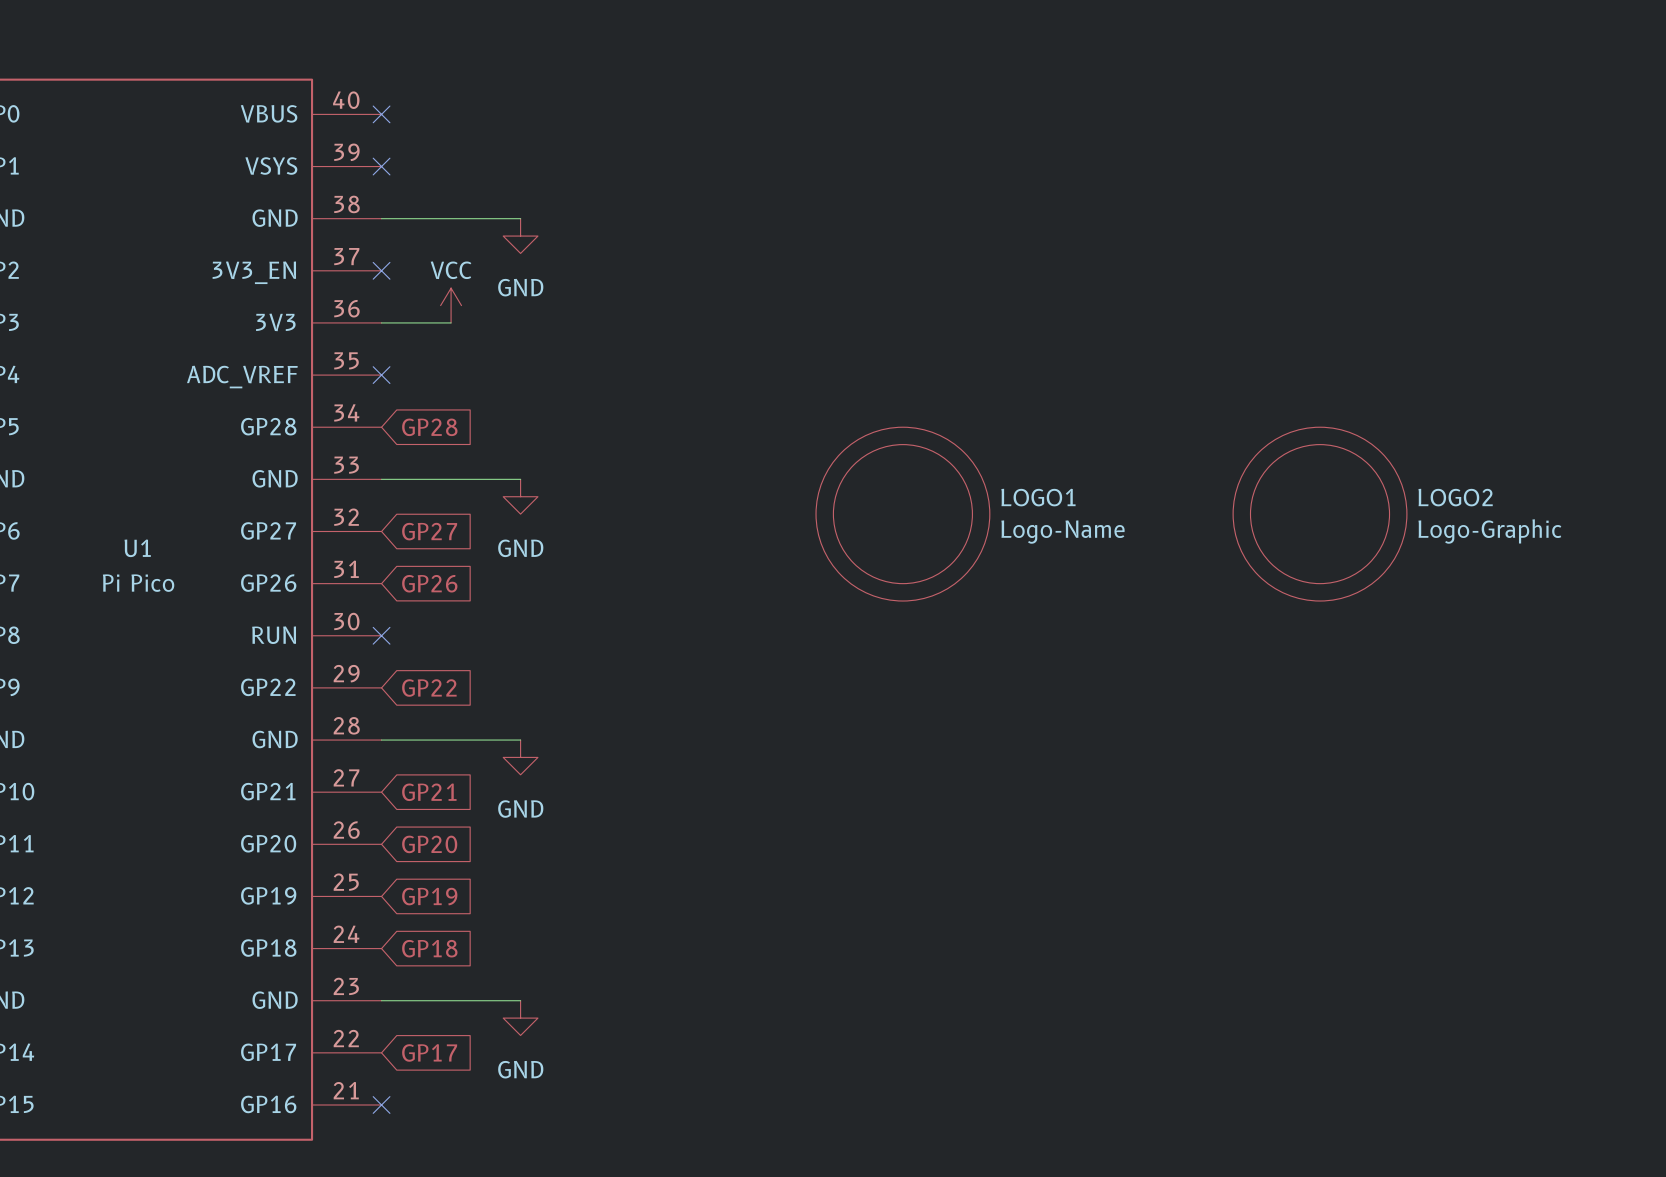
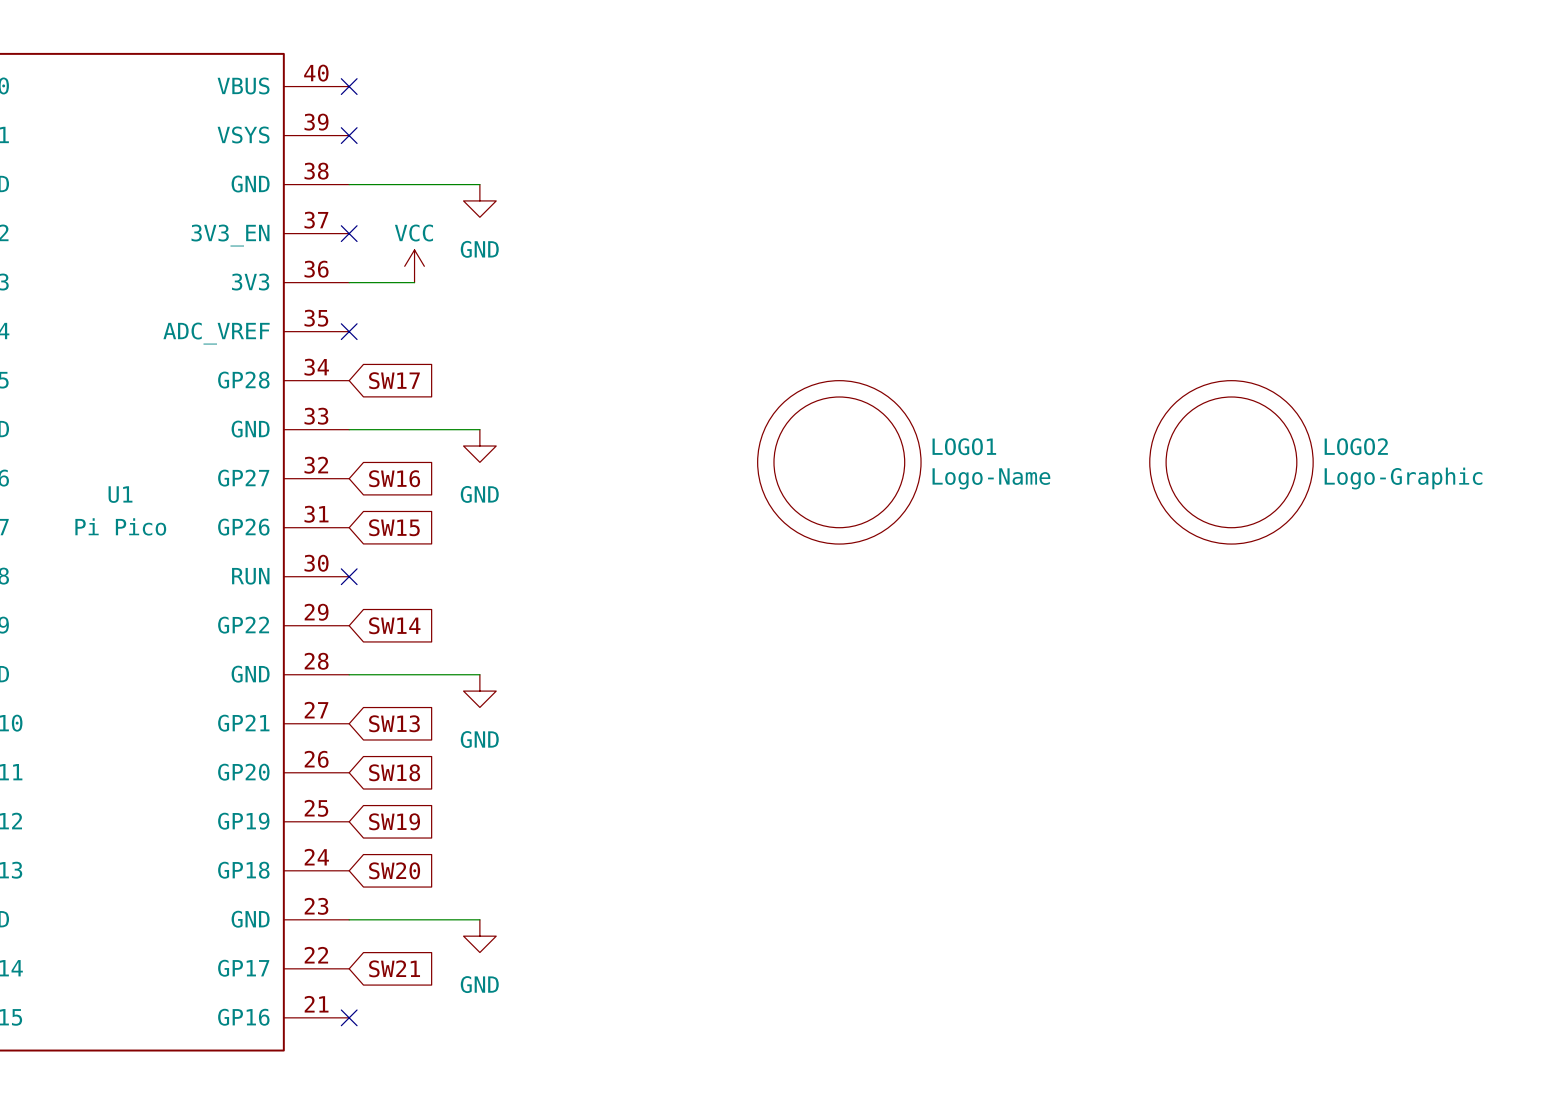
global label: GP28 (429, 427) -> SW17 (394, 380)
global label: GP27 (429, 531) -> SW16 (394, 478)
global label: GP26 (429, 583) -> SW15 (394, 527)
global label: GP22 (429, 688) -> SW14 (394, 625)
global label: GP21 (429, 792) -> SW13 (394, 723)
global label: GP20 (429, 844) -> SW18 (394, 772)
global label: GP19 (429, 896) -> SW19 (394, 821)
global label: GP18 (429, 948) -> SW20 (394, 870)
global label: GP17 (429, 1052) -> SW21 (394, 968)

